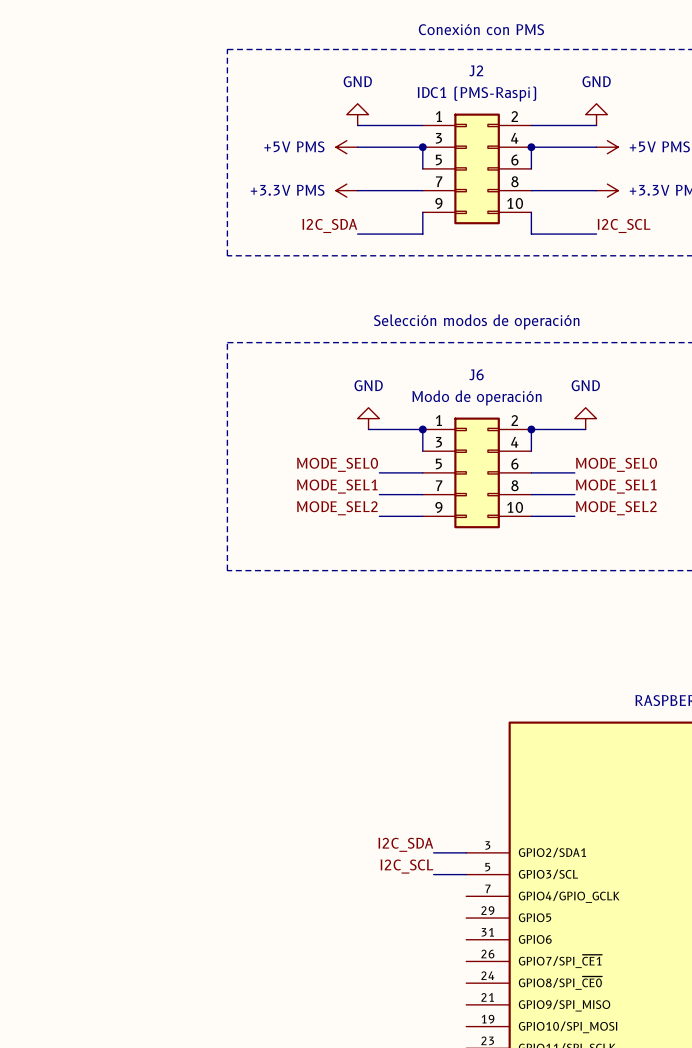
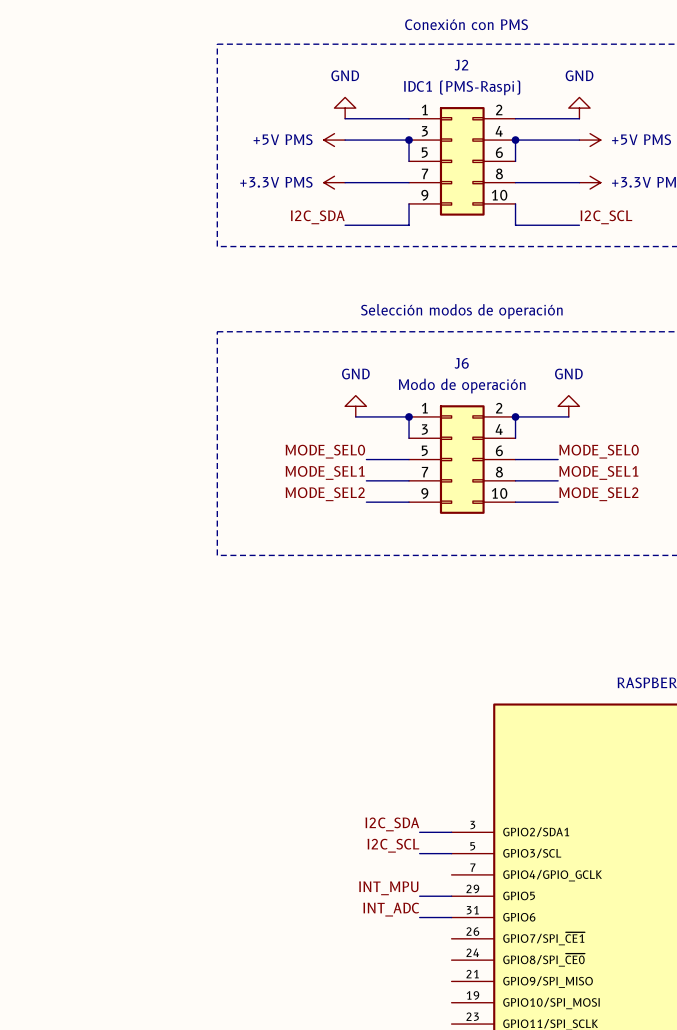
label: none -> INT_MPU (388, 888)
wire: none -> (419, 896) (451, 896)
label: none -> INT_ADC (391, 909)
wire: none -> (419, 917) (451, 917)

